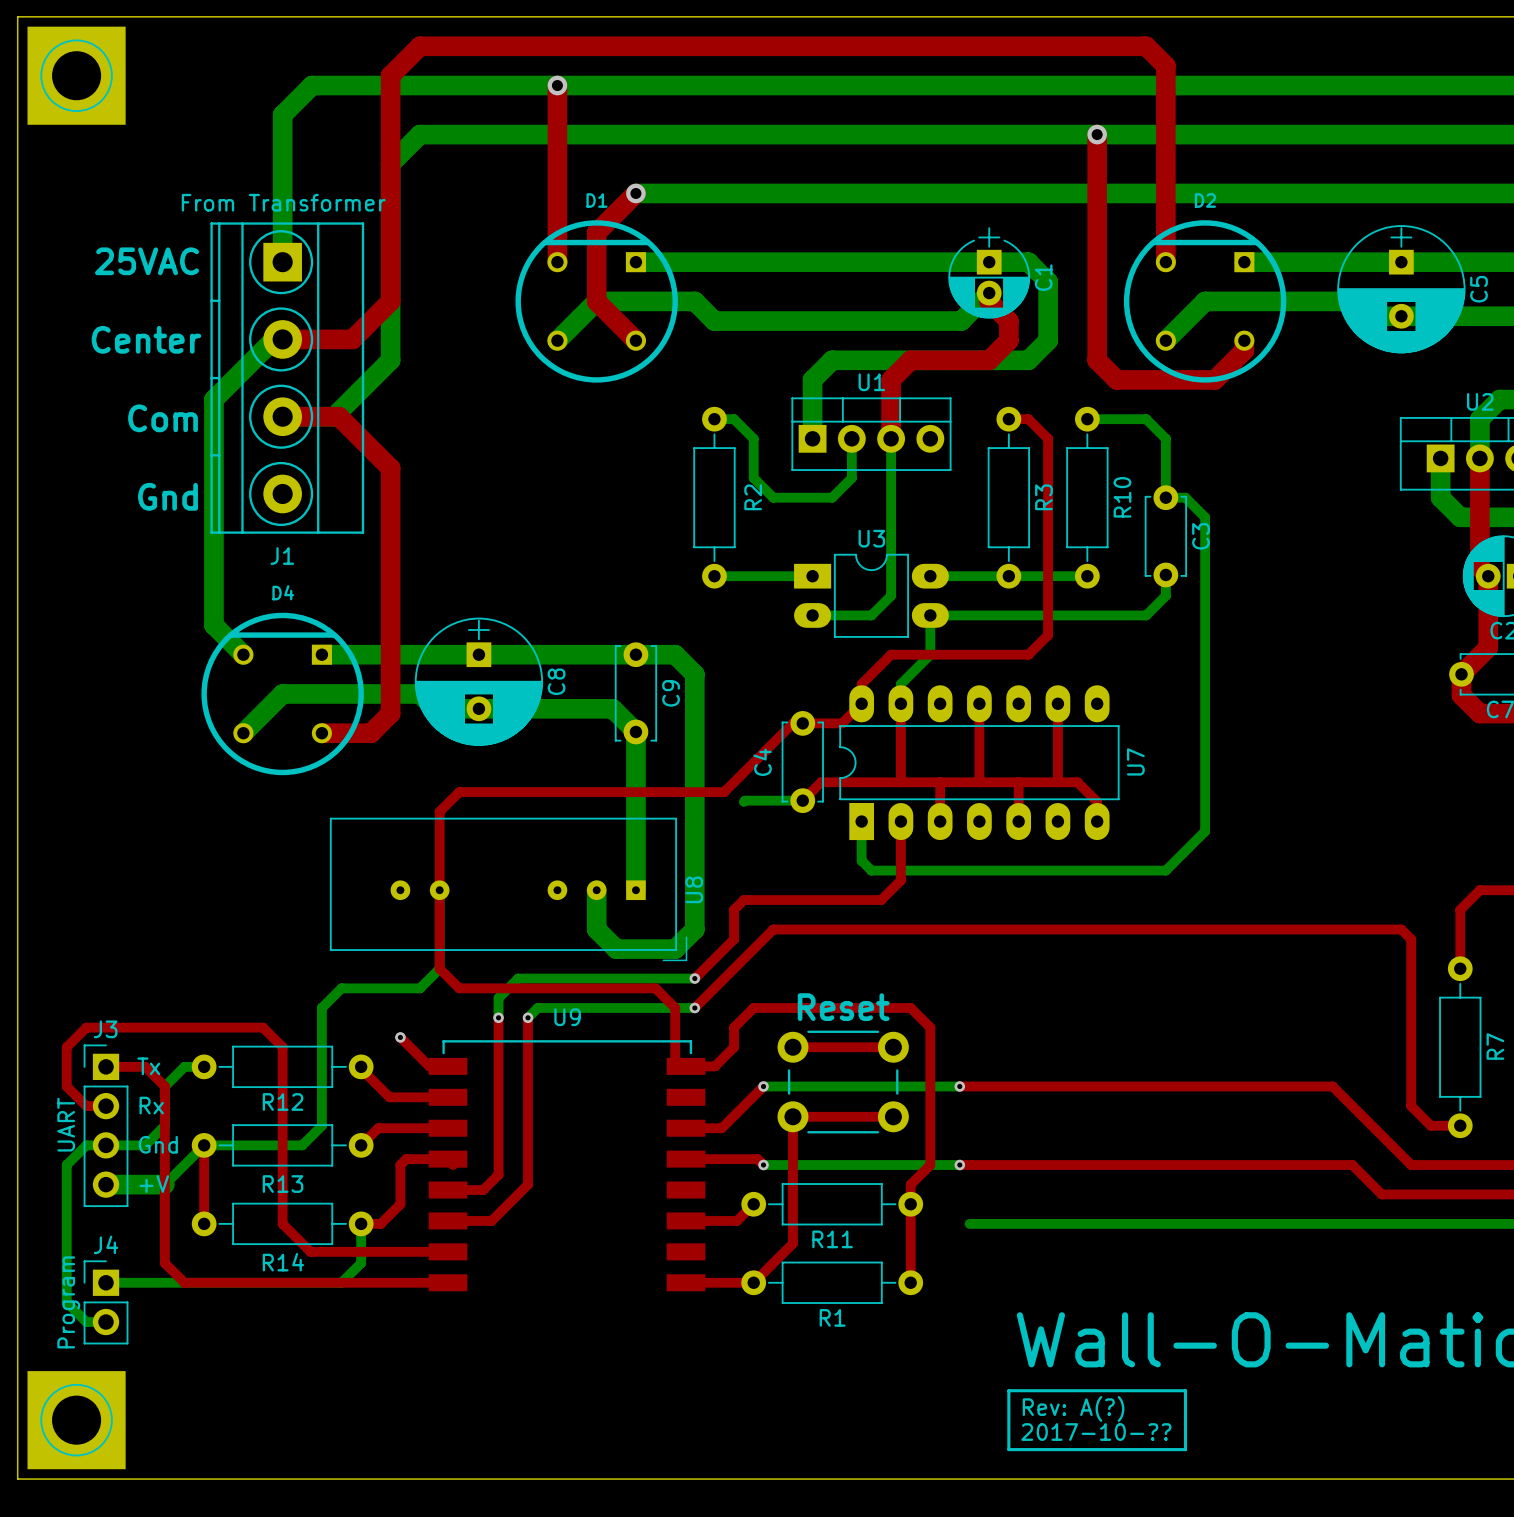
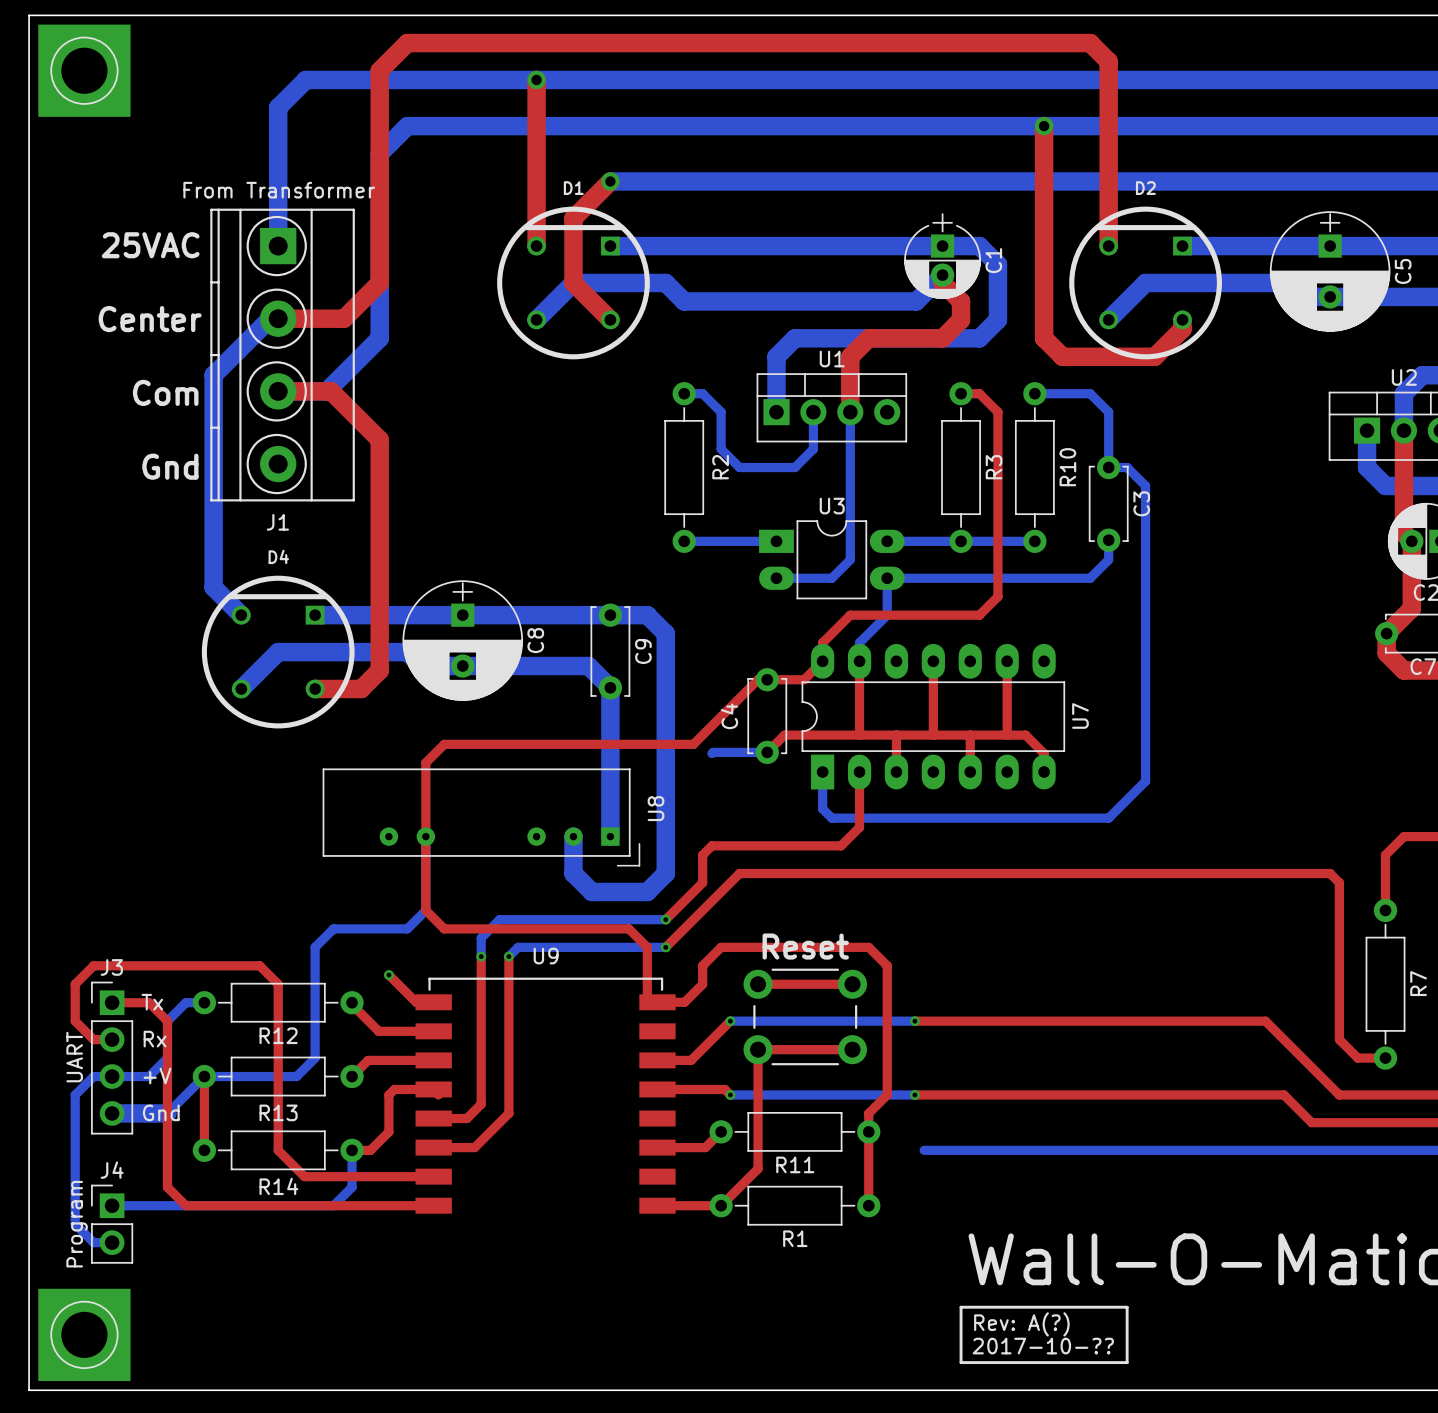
U8 footprint: [329, 817, 688, 962] -> [322, 768, 641, 867]
text: Gnd (158, 1144) -> +V (157, 1075)
text: +V (154, 1184) -> Gnd (161, 1112)

